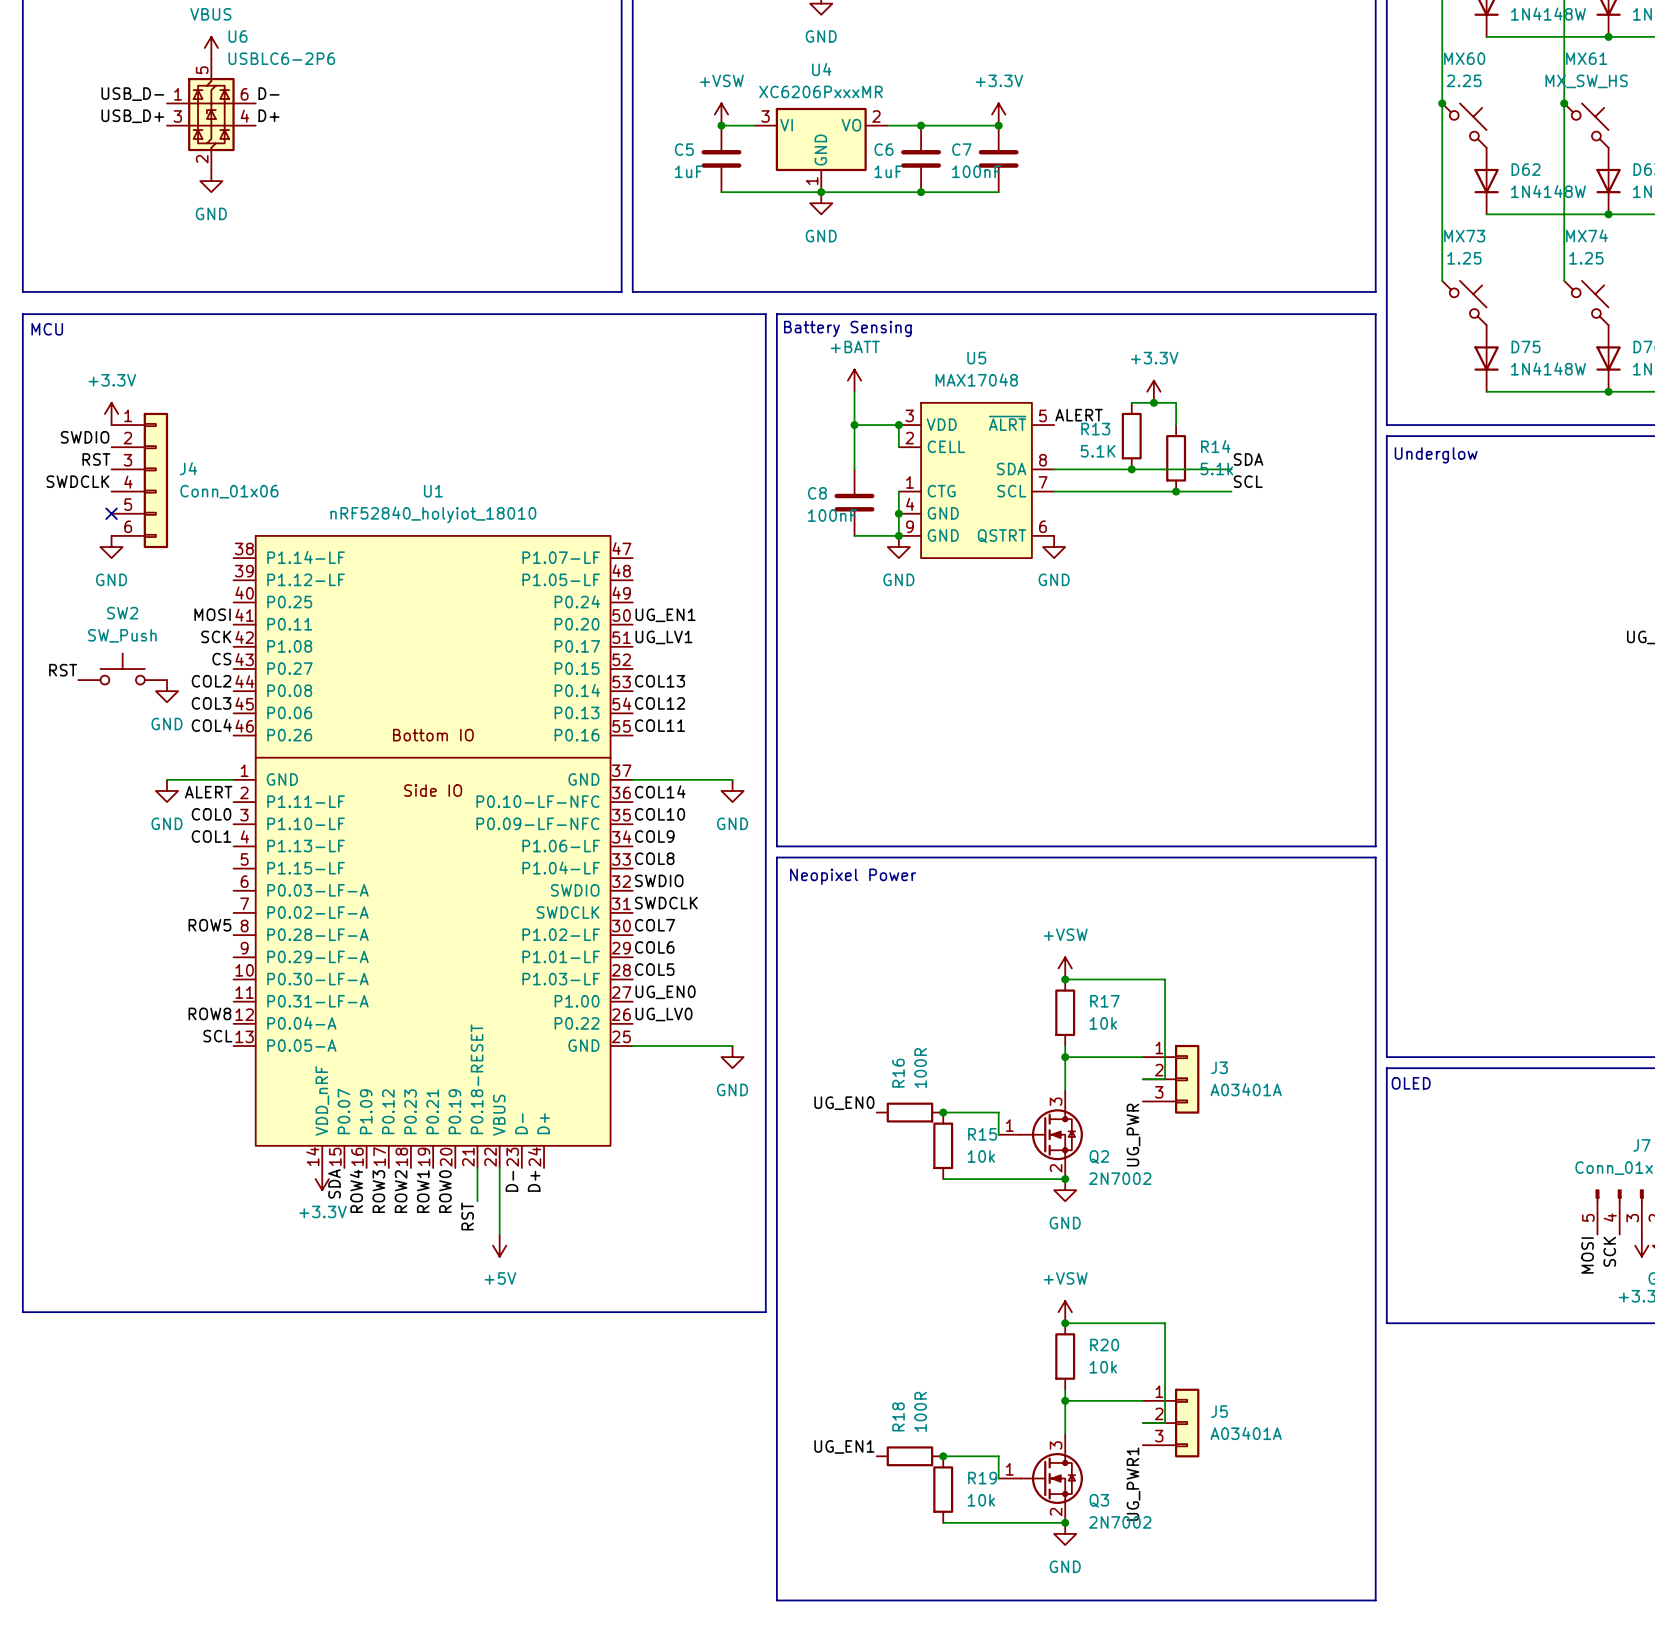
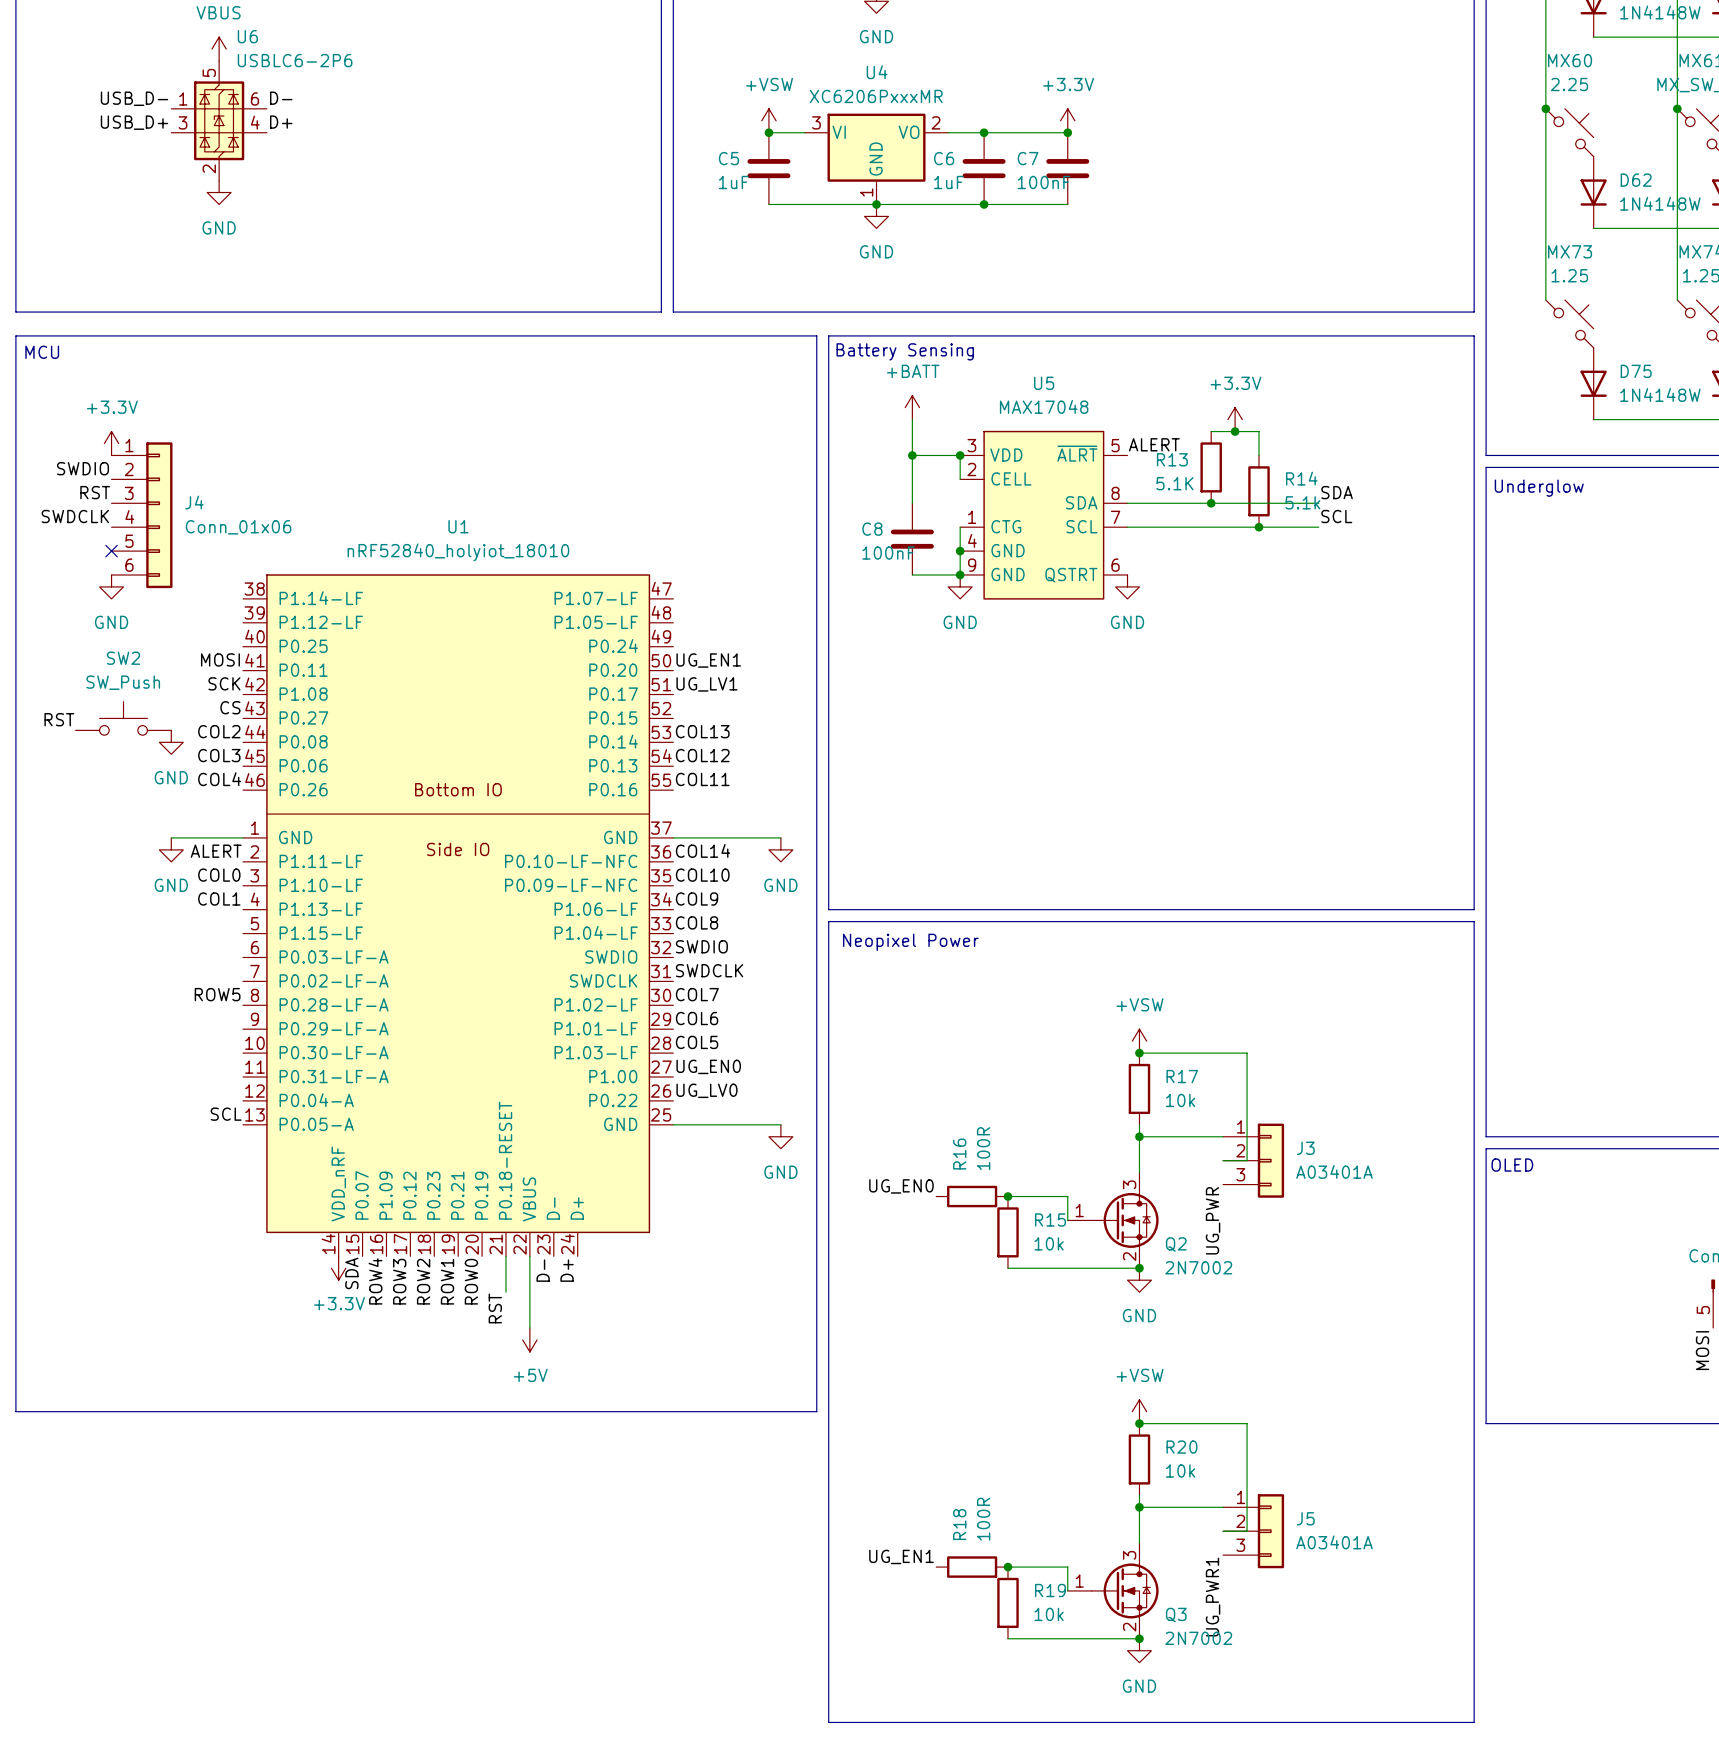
label: ROW8 (209, 1013) -> none

